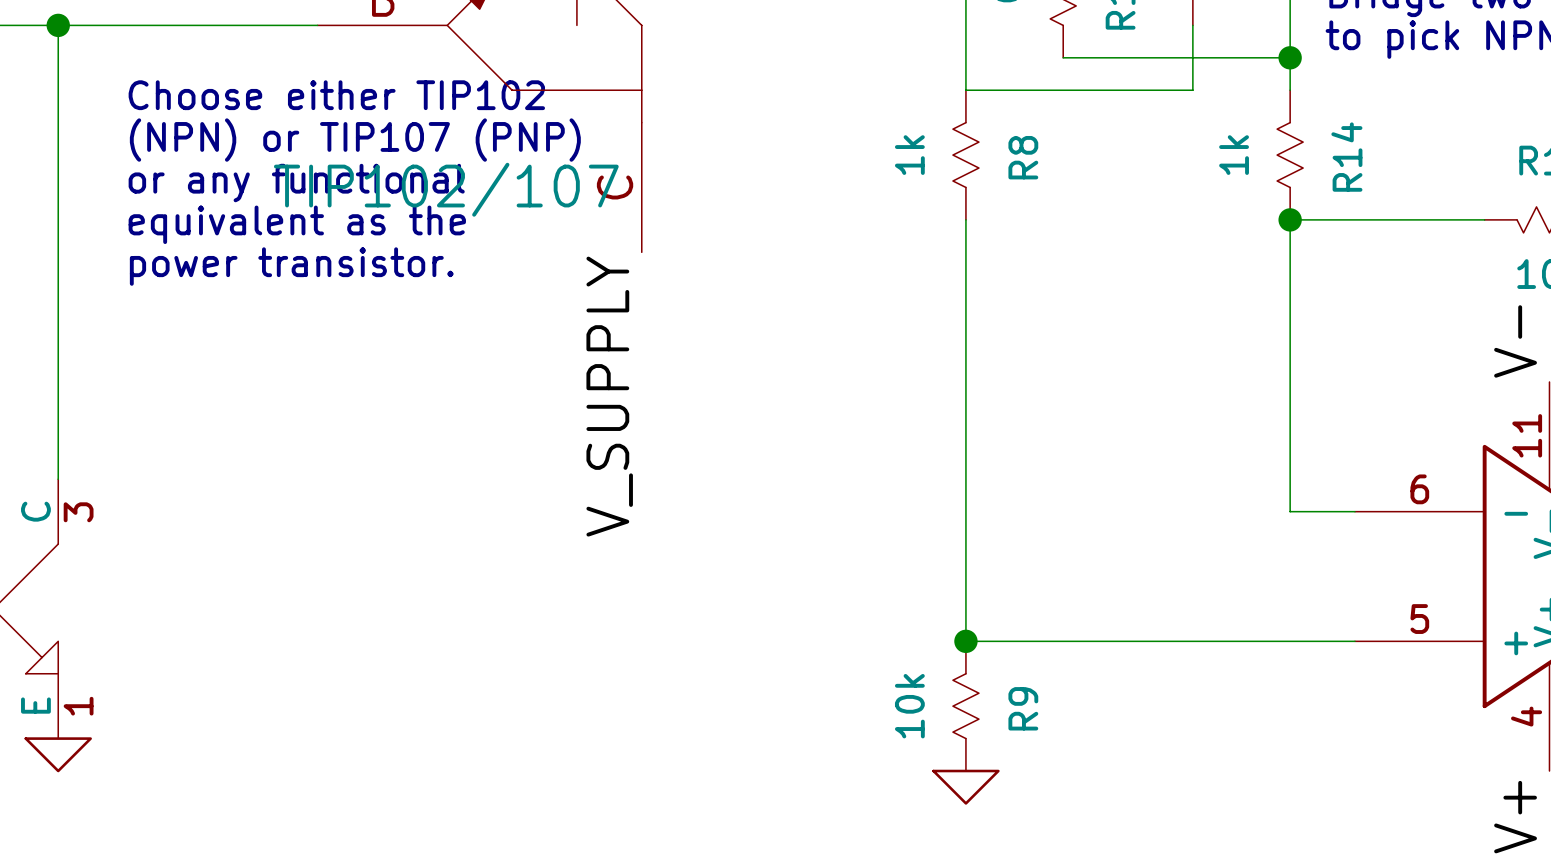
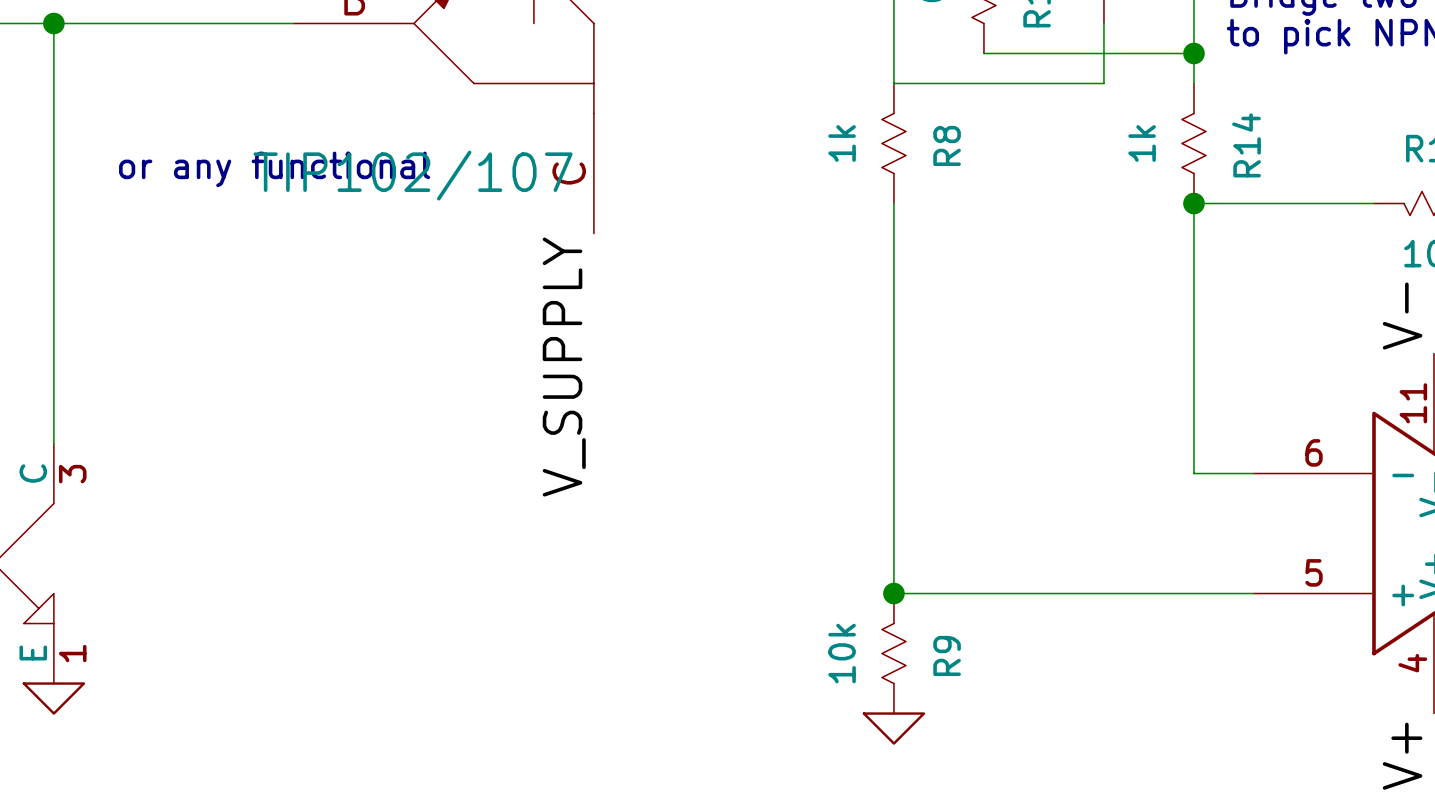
text: Choose either TIP102 (336, 95) -> none
text: (NPN) or TIP107 (PNP) (355, 140) -> none
text: equivalent as the (297, 224) -> none
text: power transistor. (291, 266) -> none

